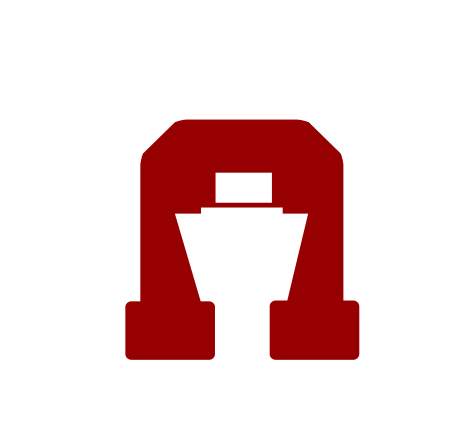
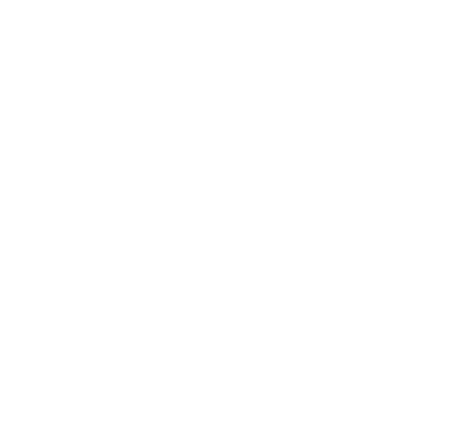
part: (242, 239) -> none

